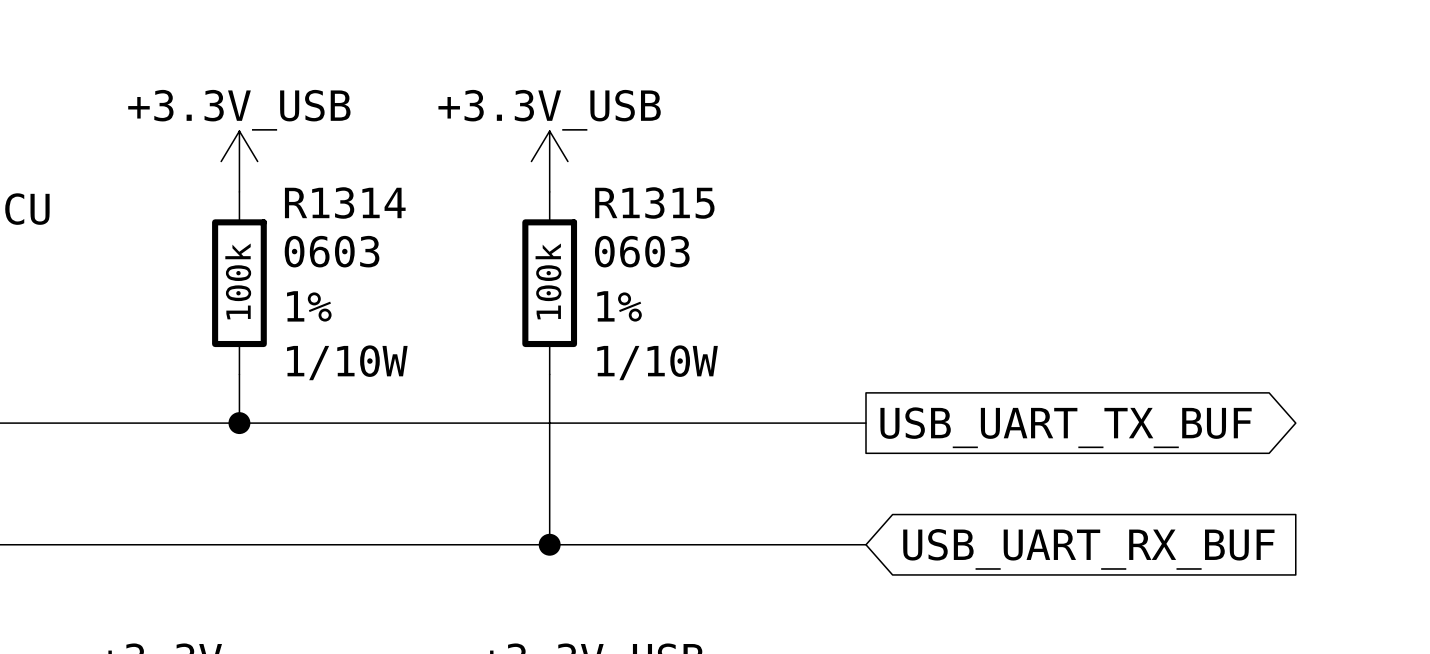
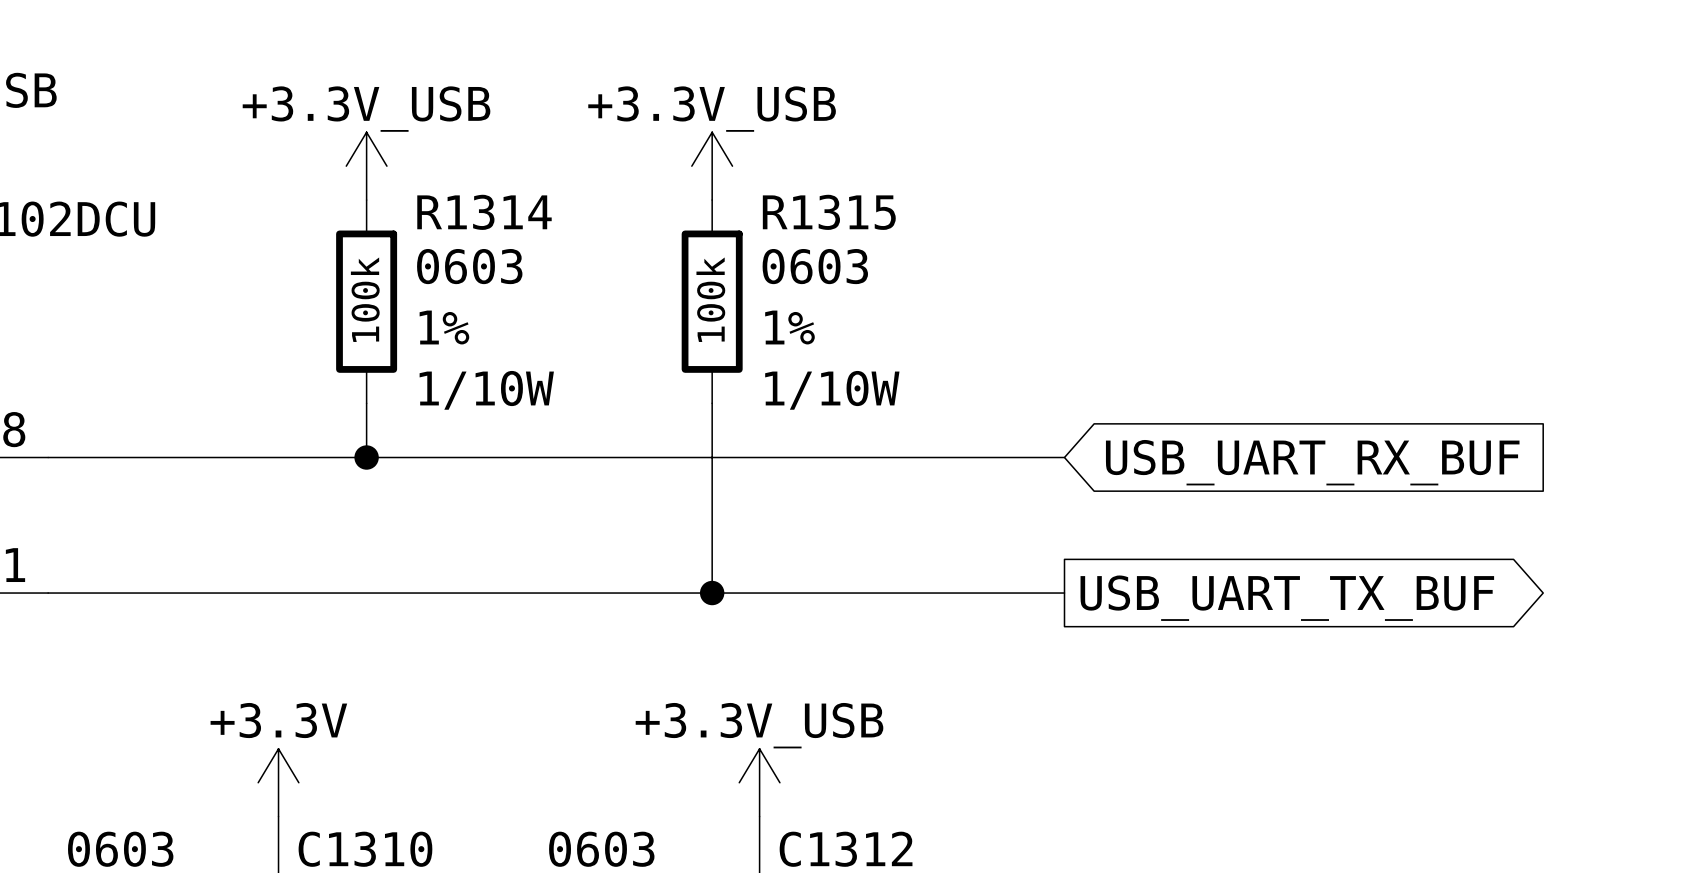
global label shape: output (1066, 427) -> input (1312, 462)
global label: USB_UART_TX_BUF (1066, 427) -> USB_UART_RX_BUF (1312, 462)
global label shape: input (1088, 549) -> output (1287, 598)
global label: USB_UART_RX_BUF (1088, 549) -> USB_UART_TX_BUF (1287, 598)

